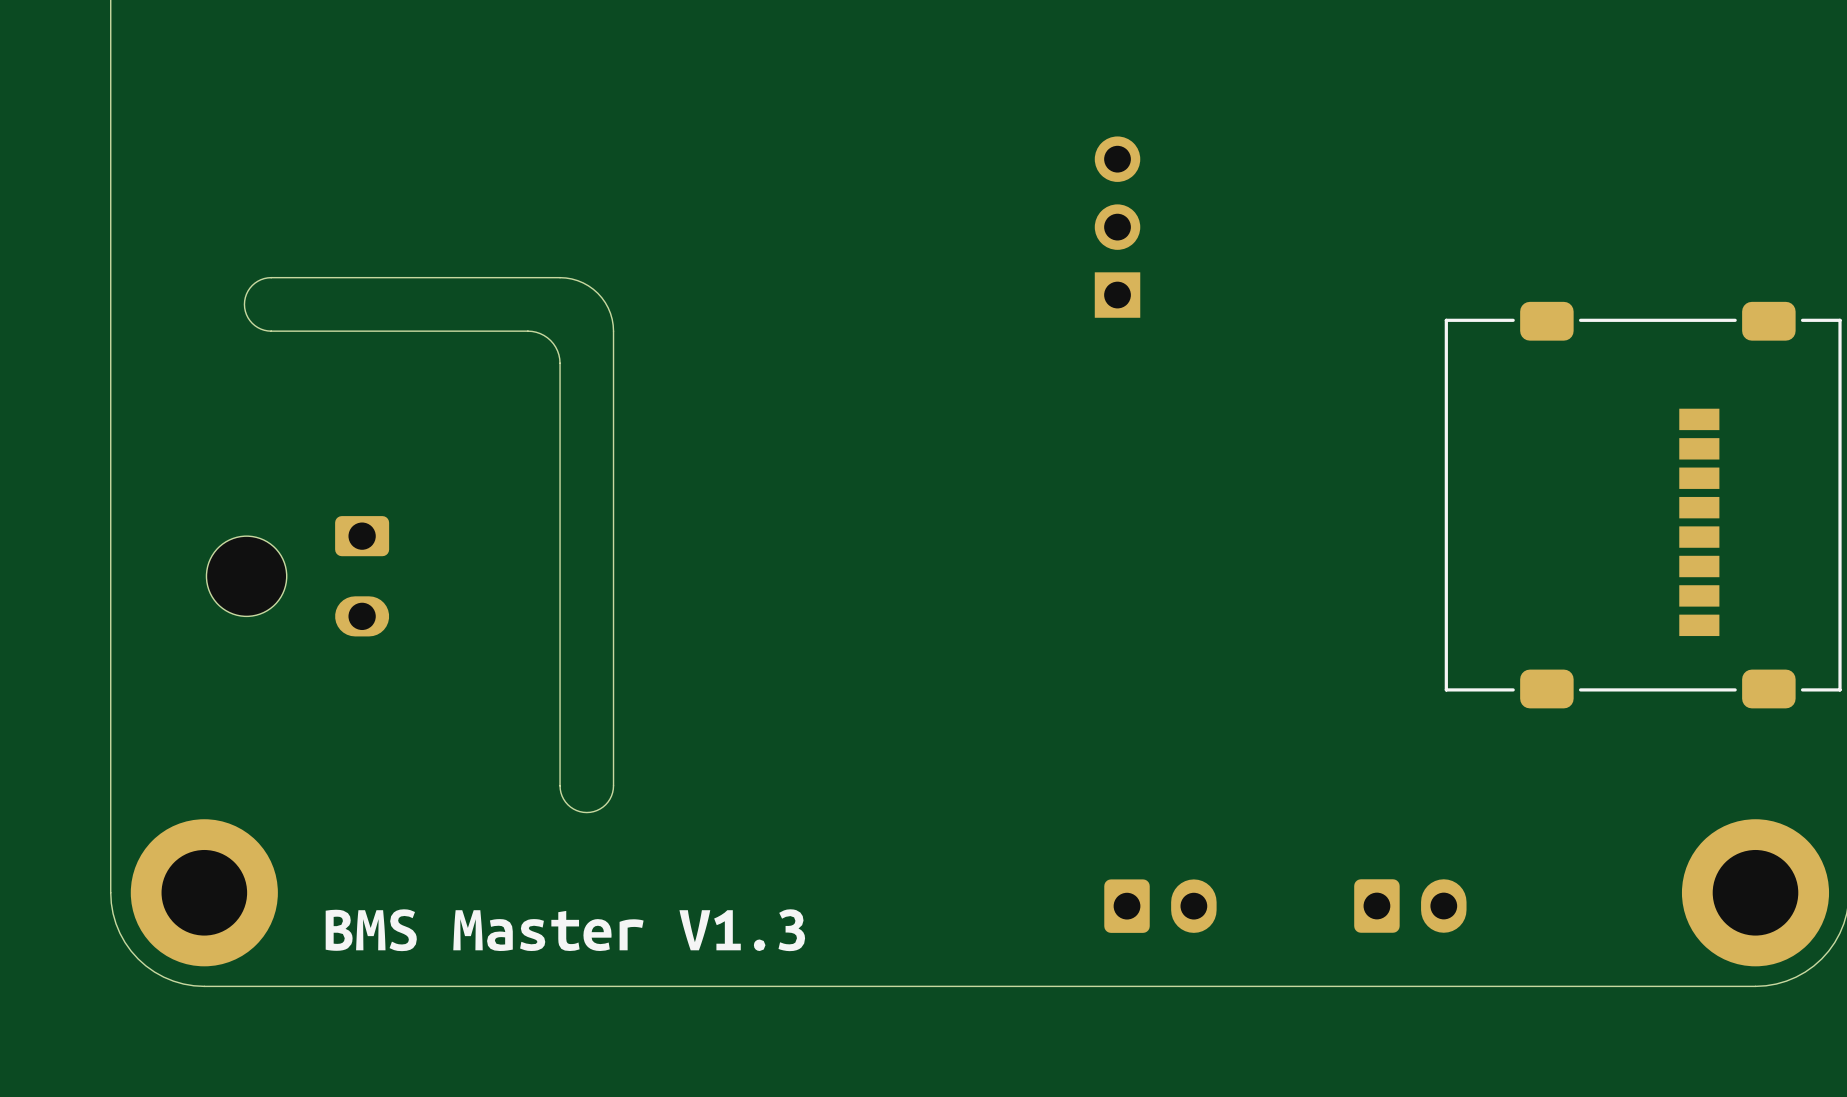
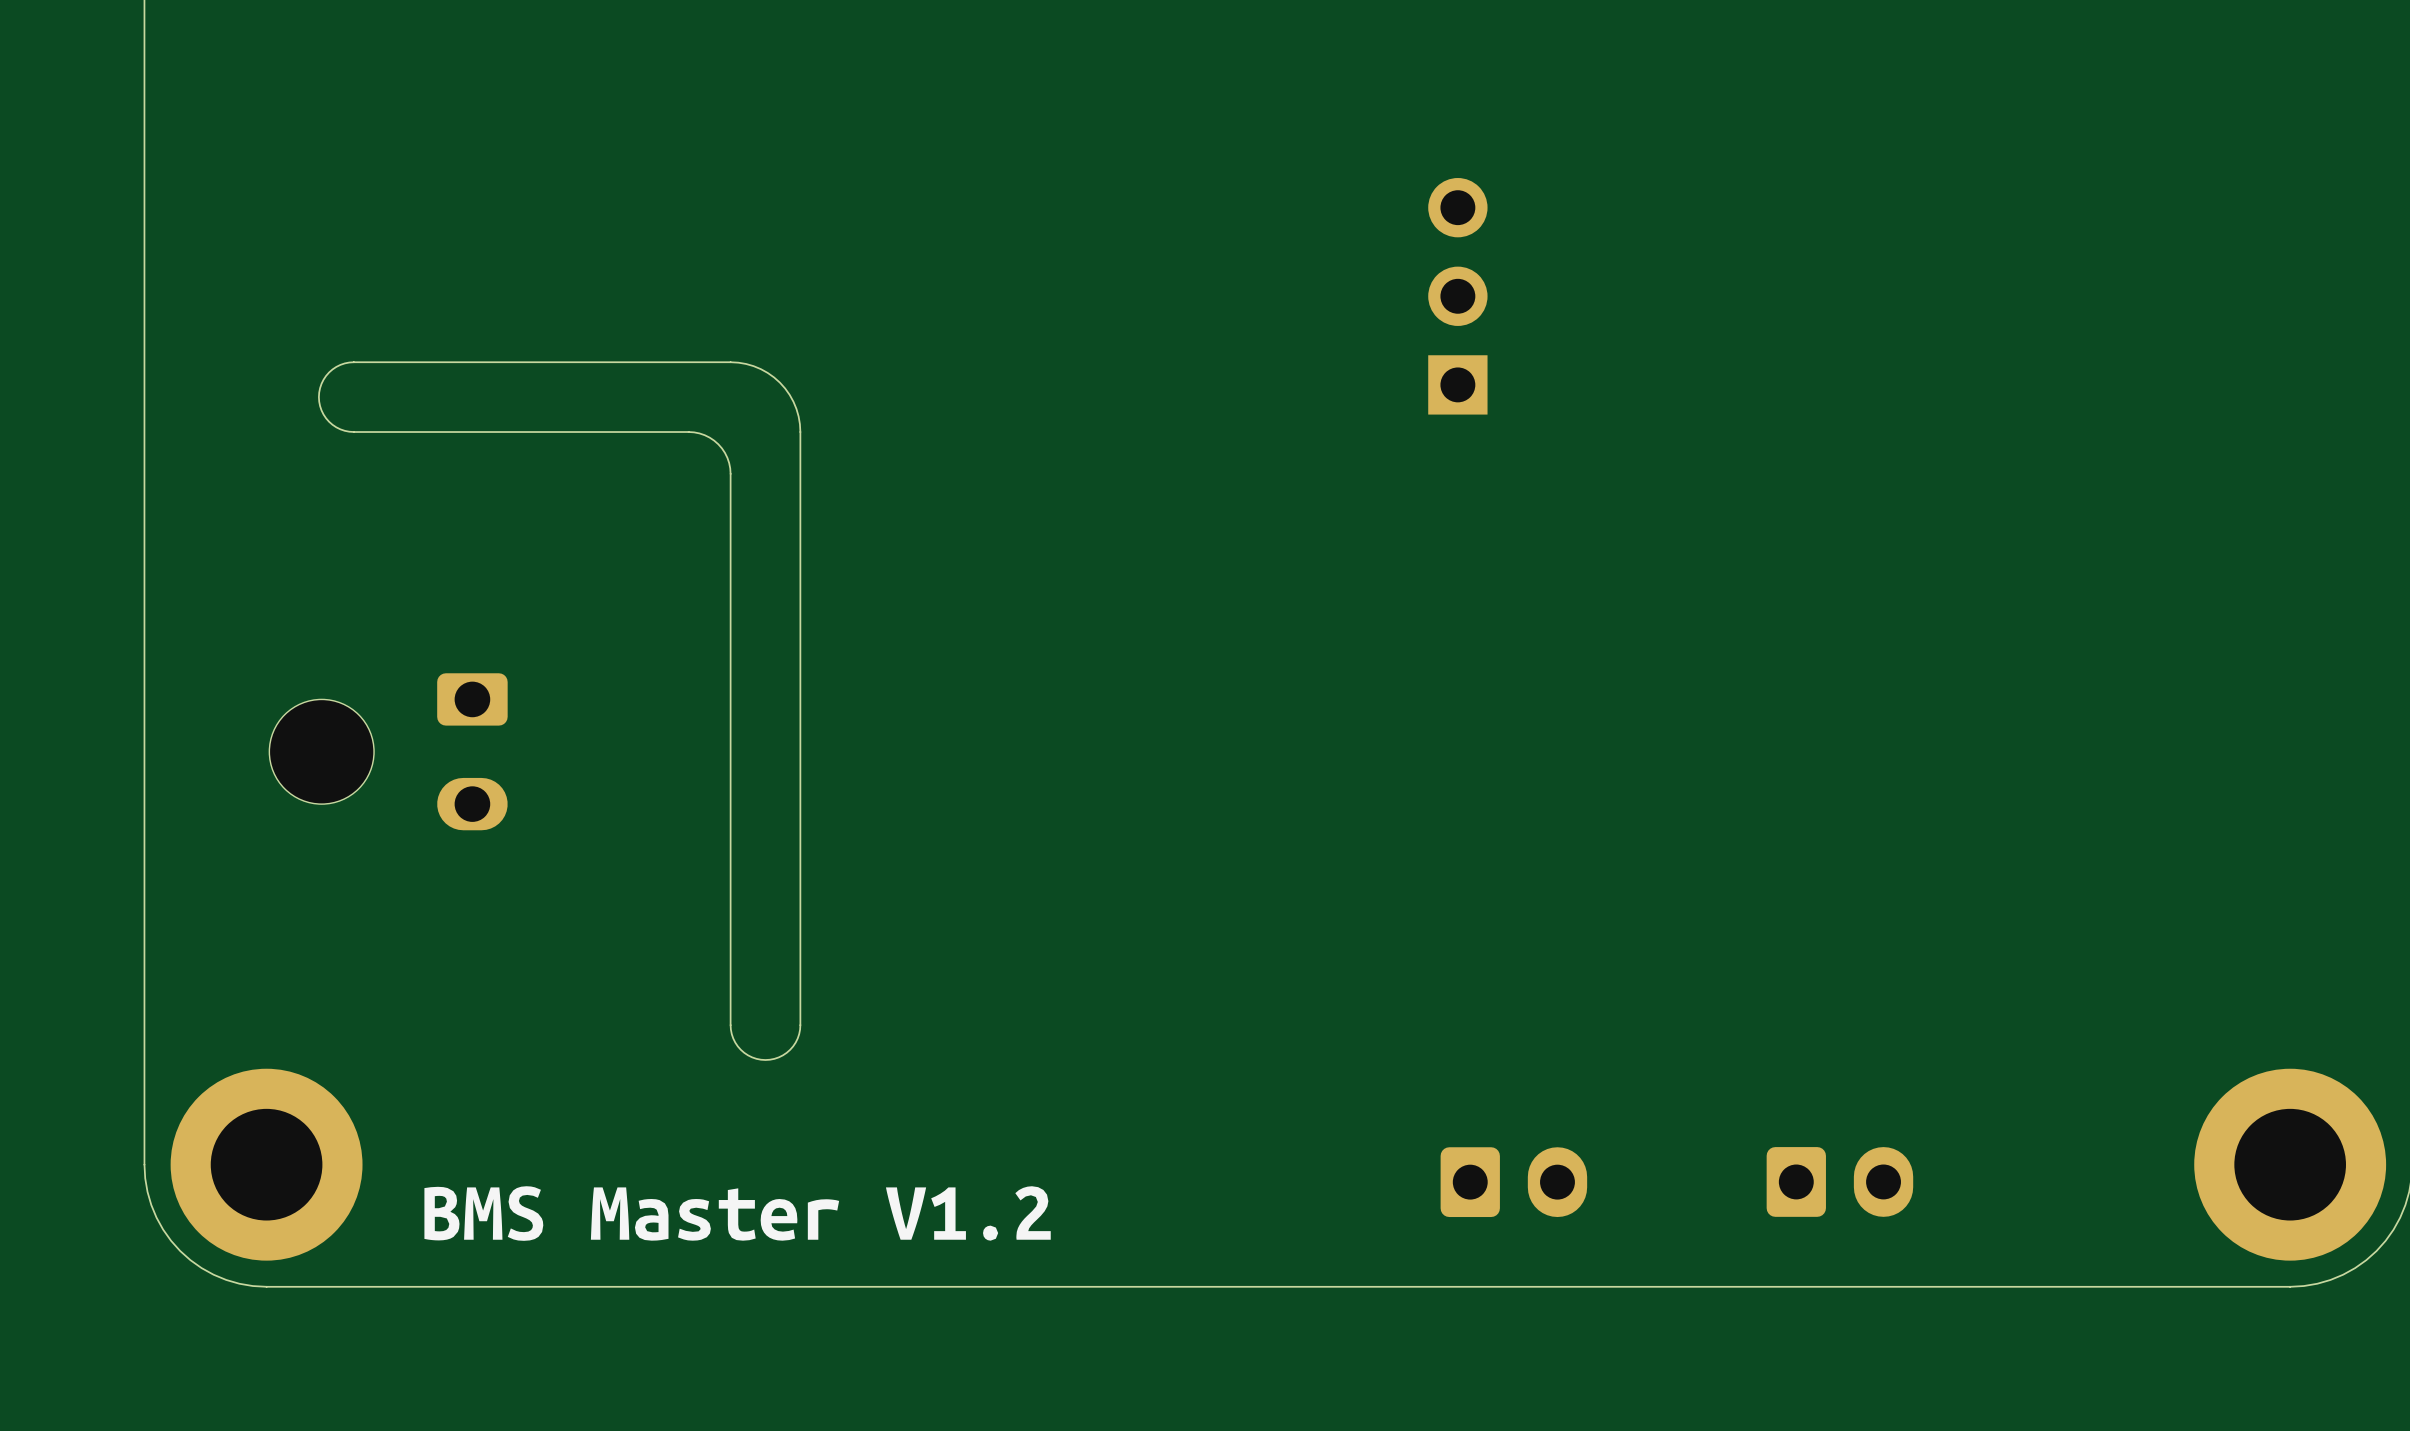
part: (1643, 505) -> none
drawing shape: [325, 909, 806, 952] -> [424, 1186, 1051, 1241]

